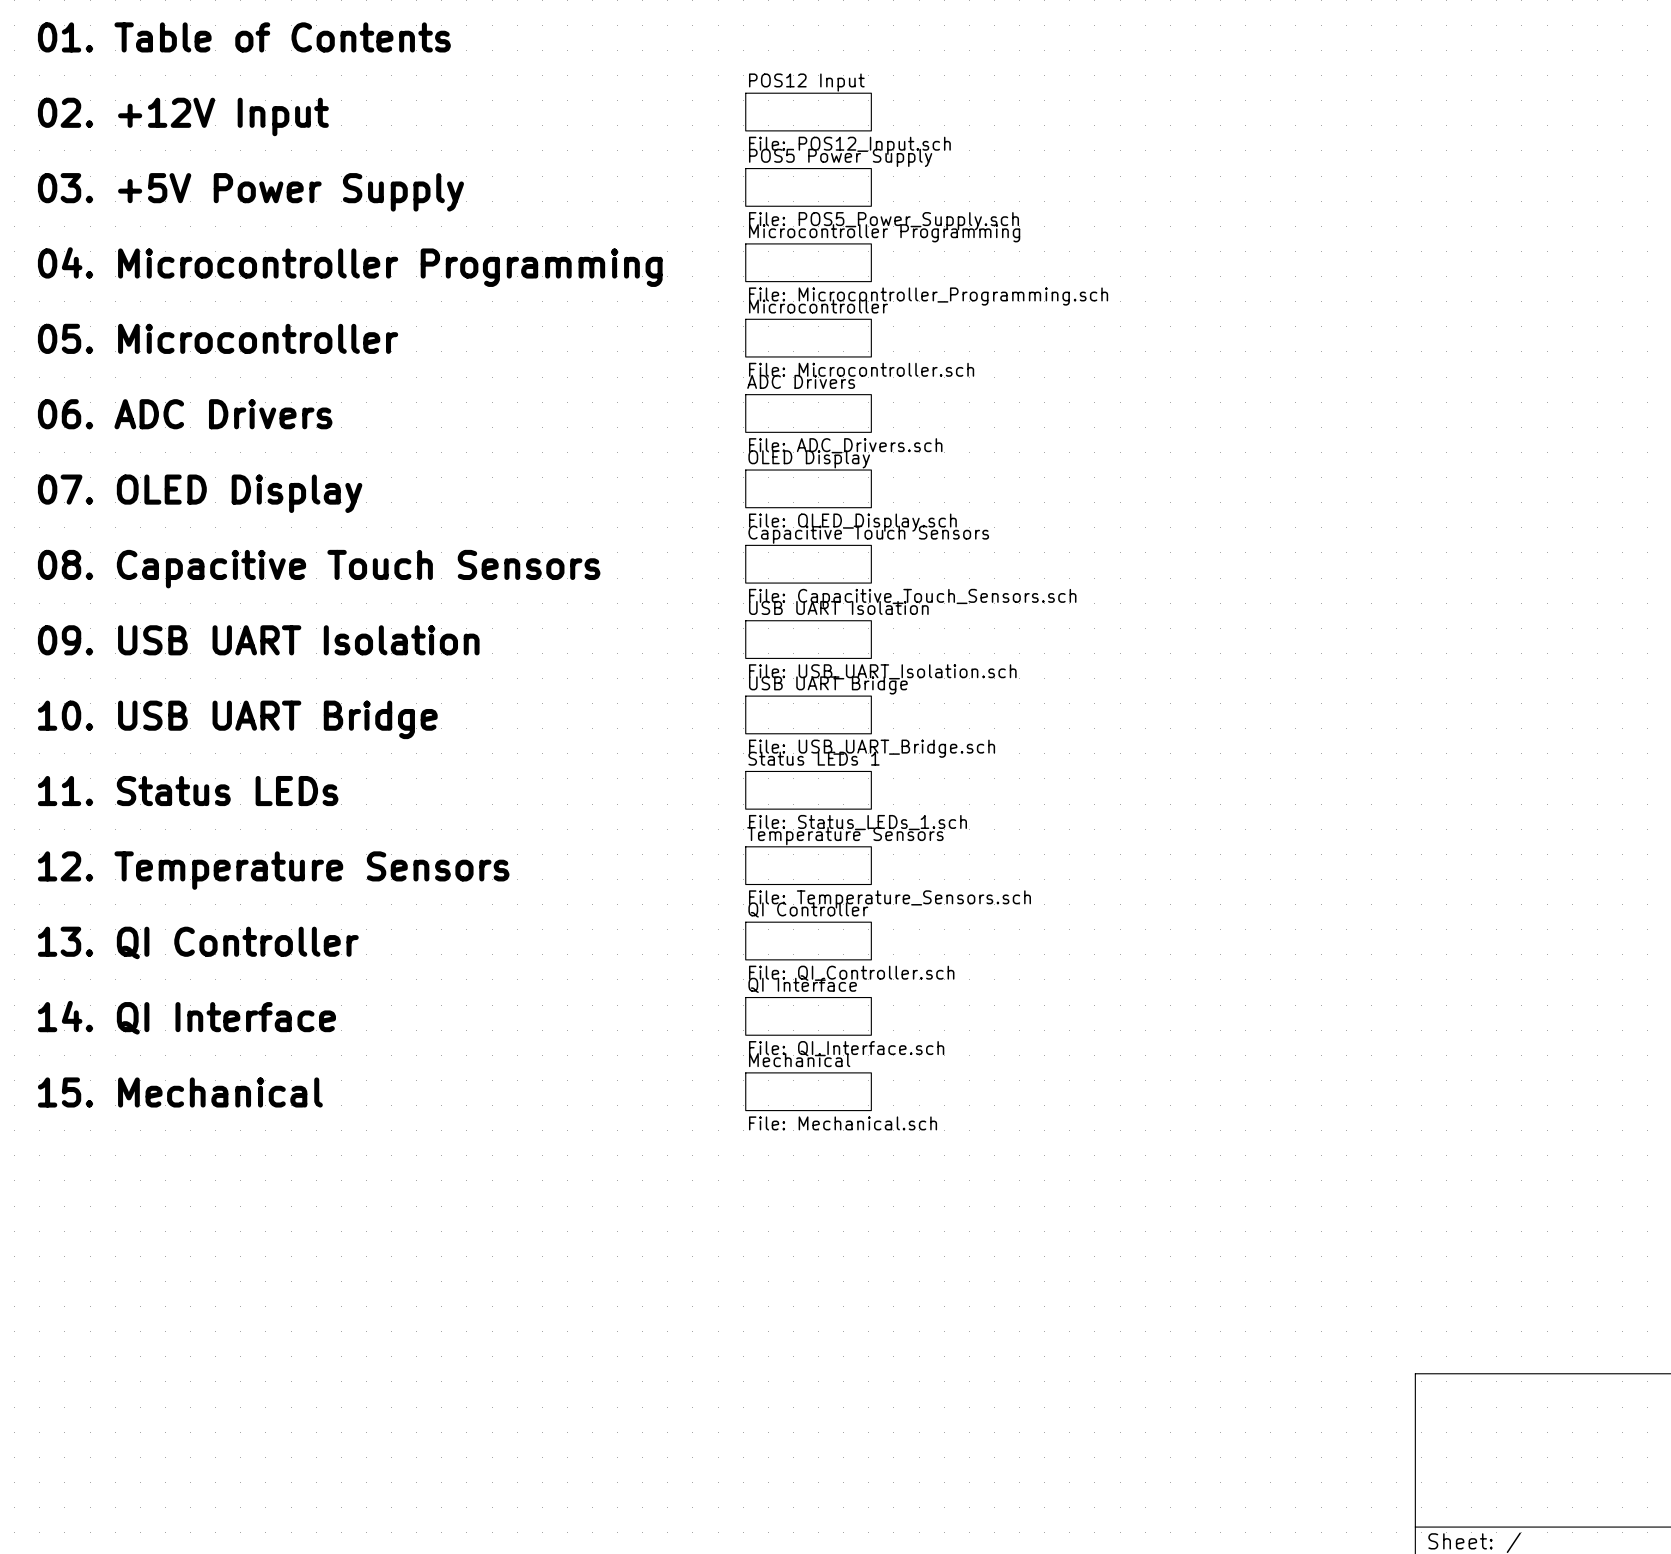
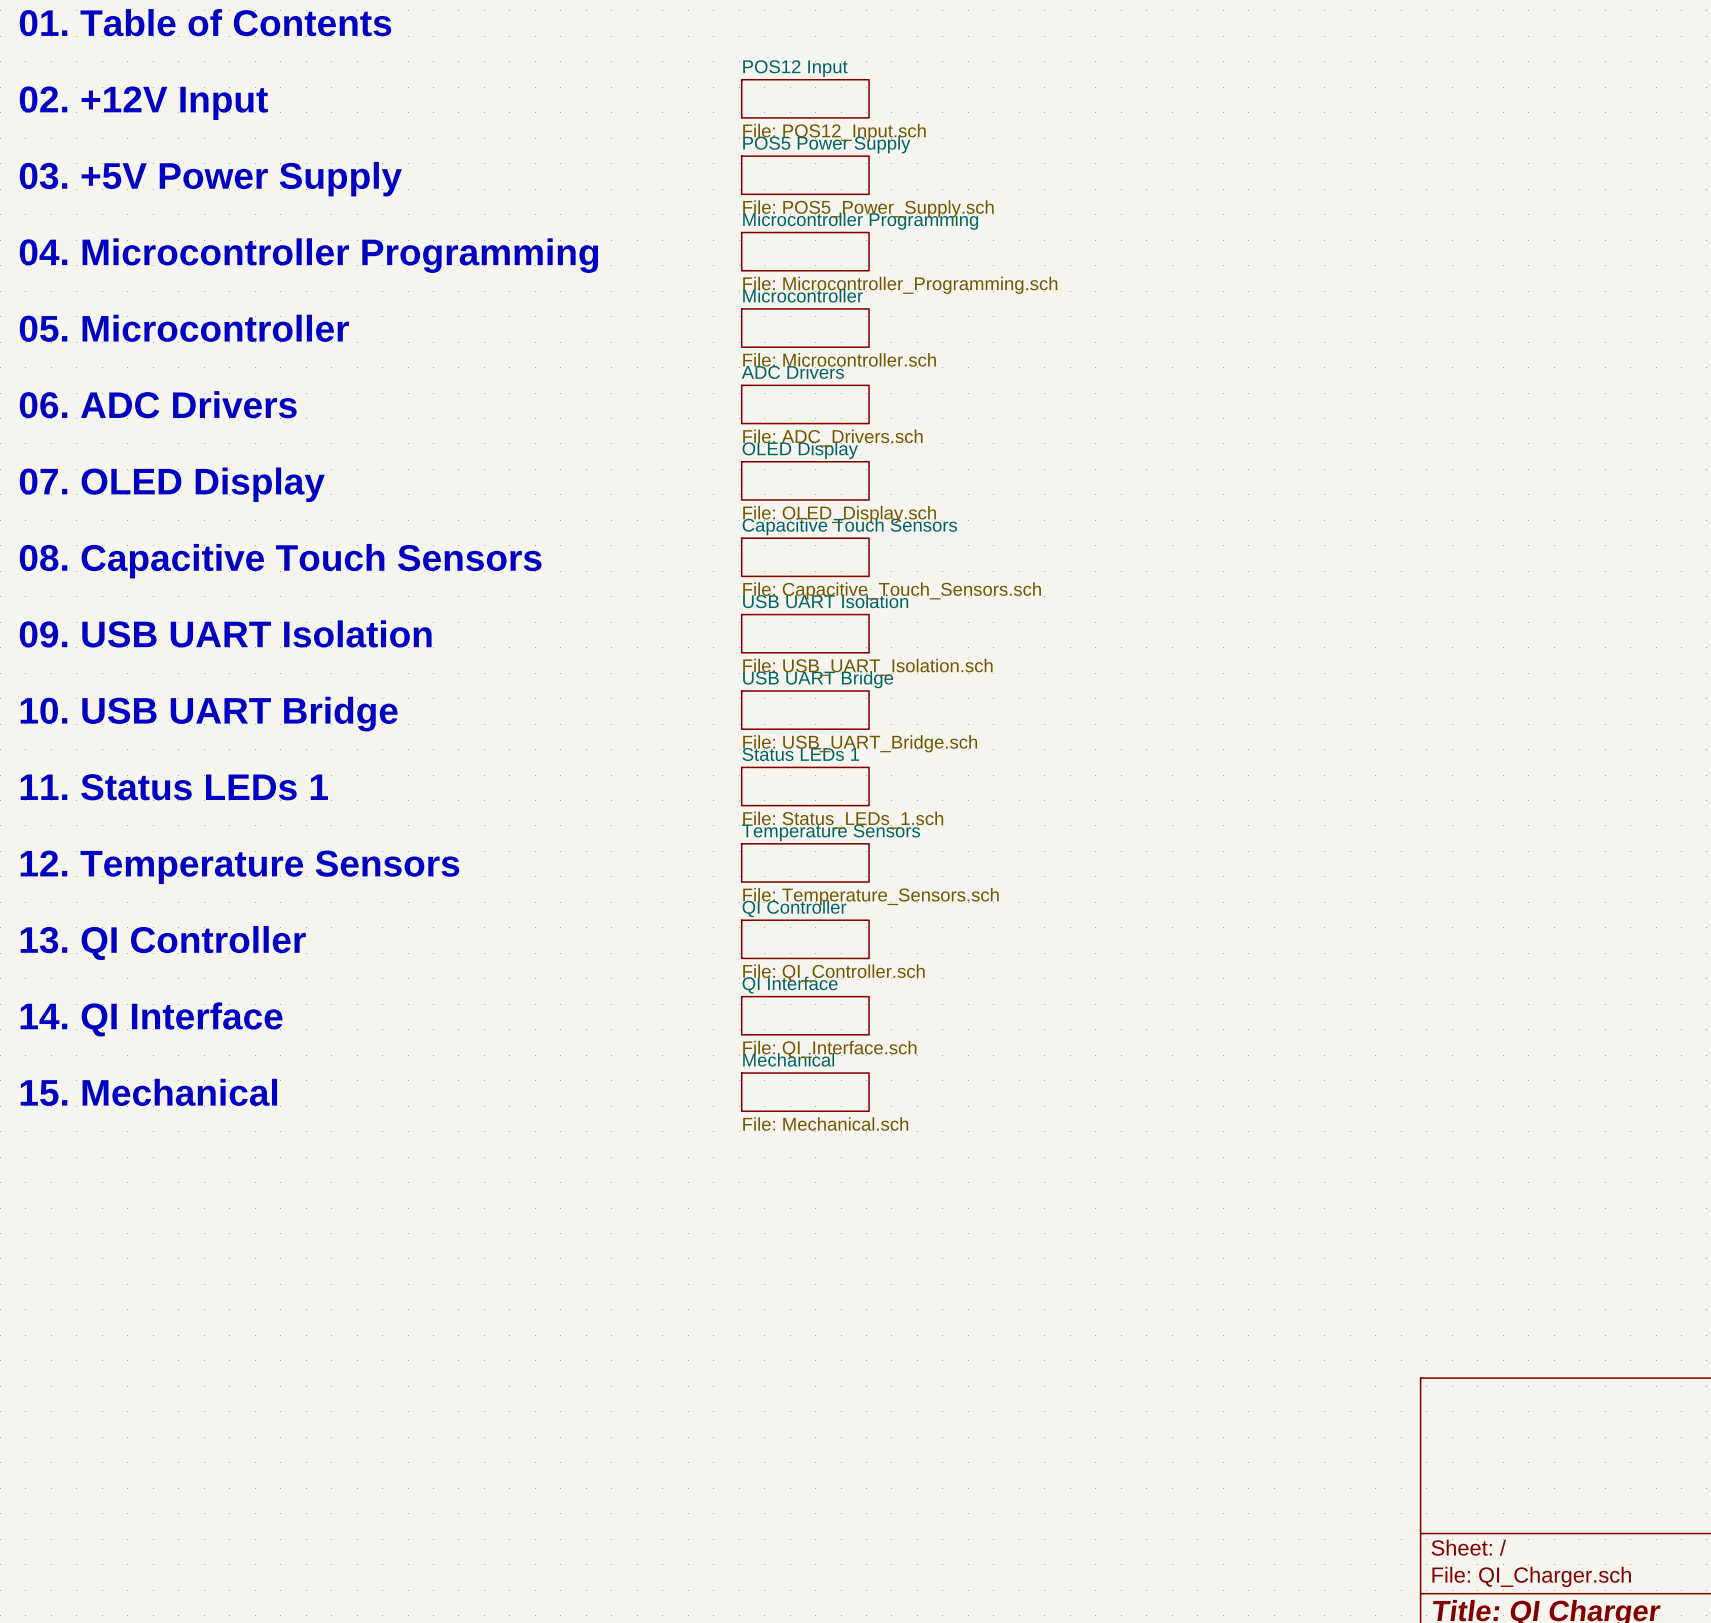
text: 11. Status LEDs (188, 791) -> 11. Status LEDs 1 (174, 787)

